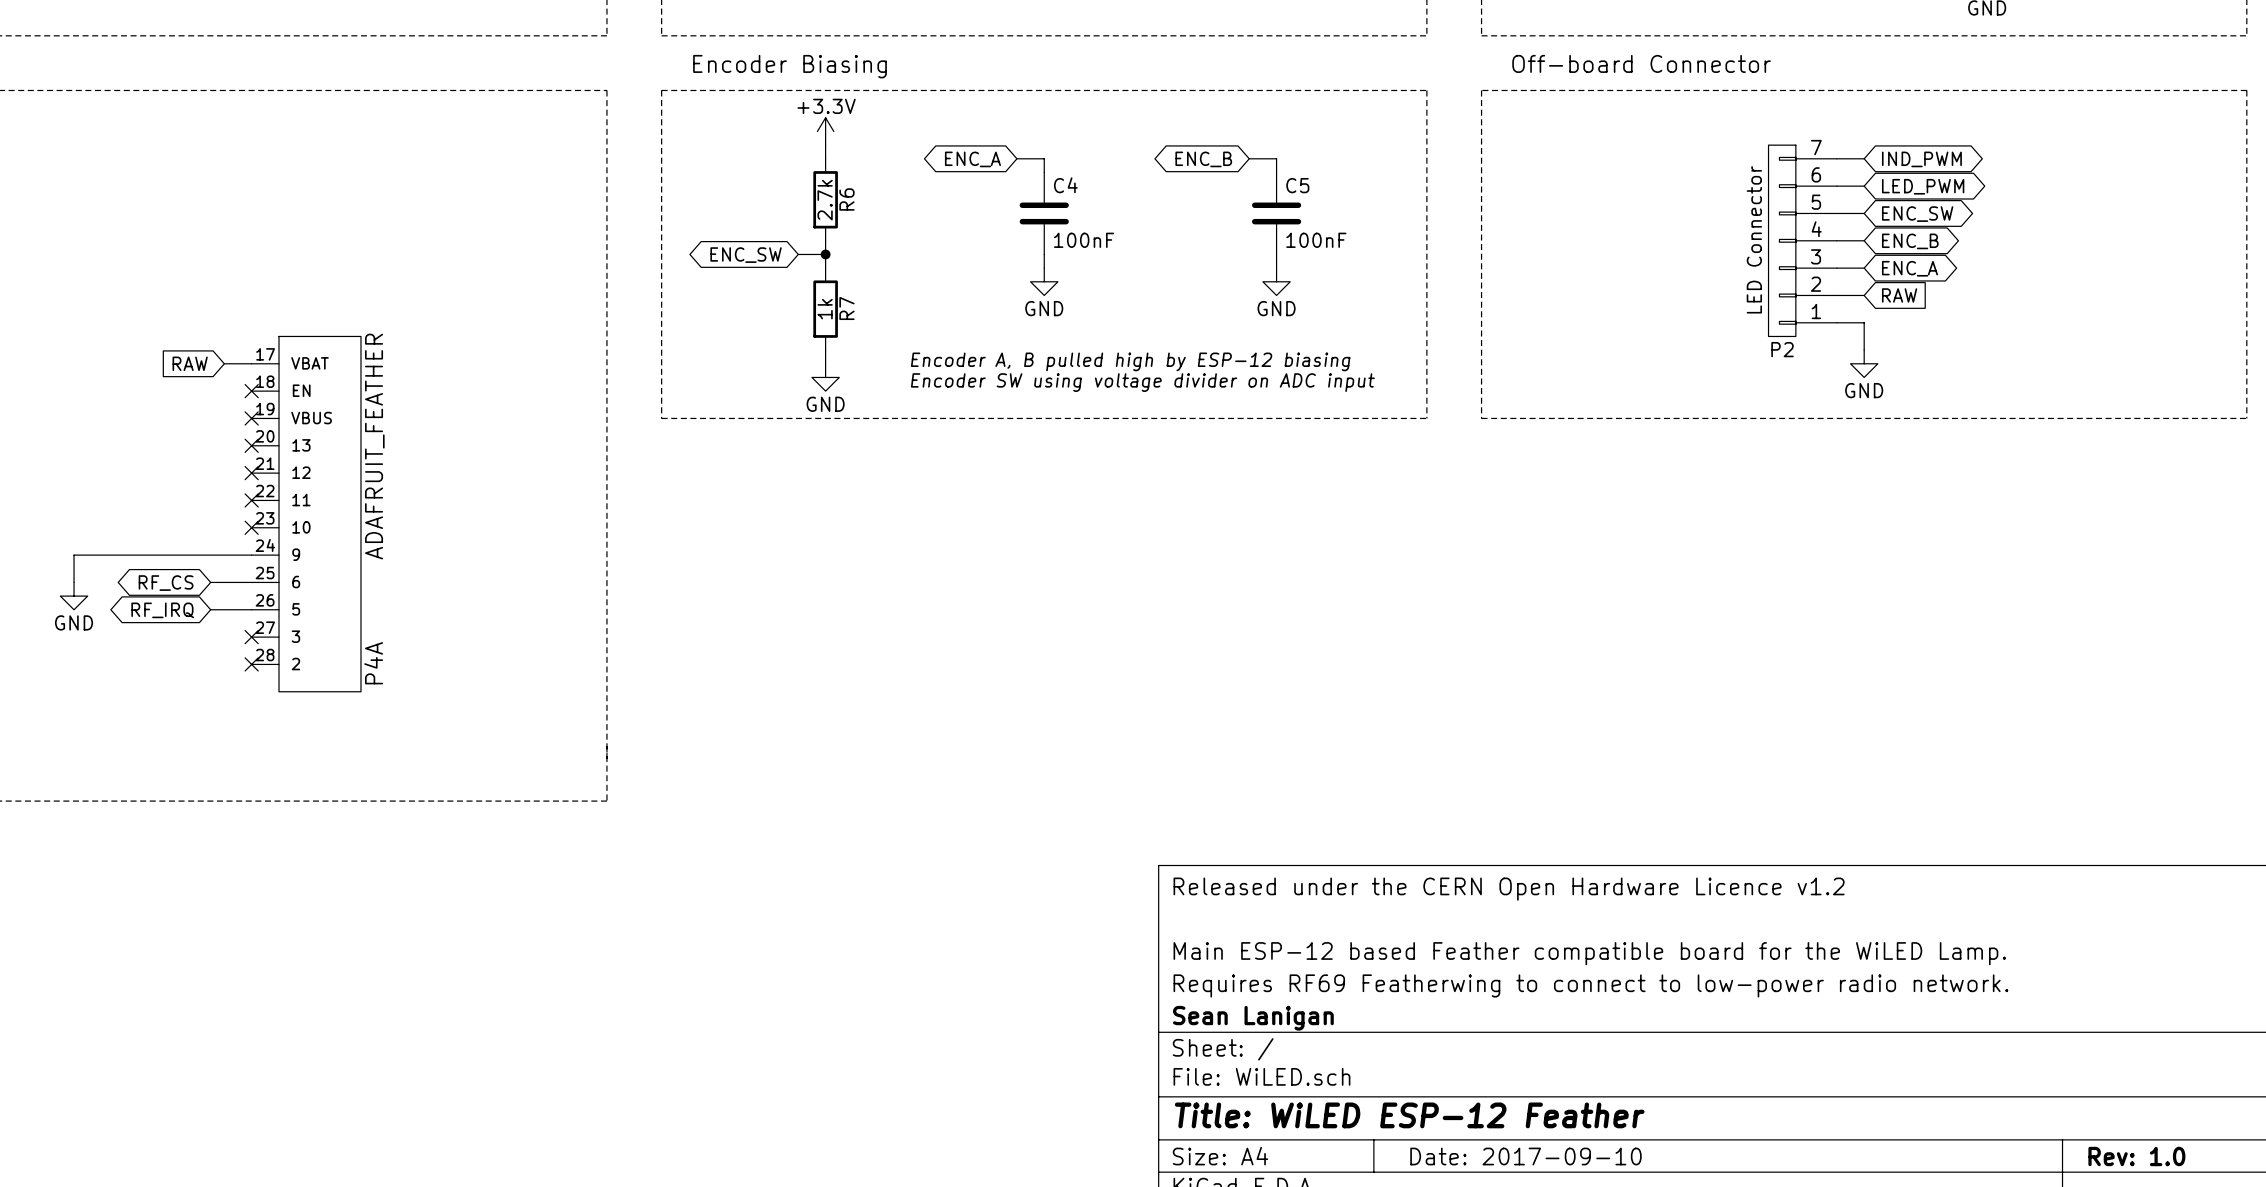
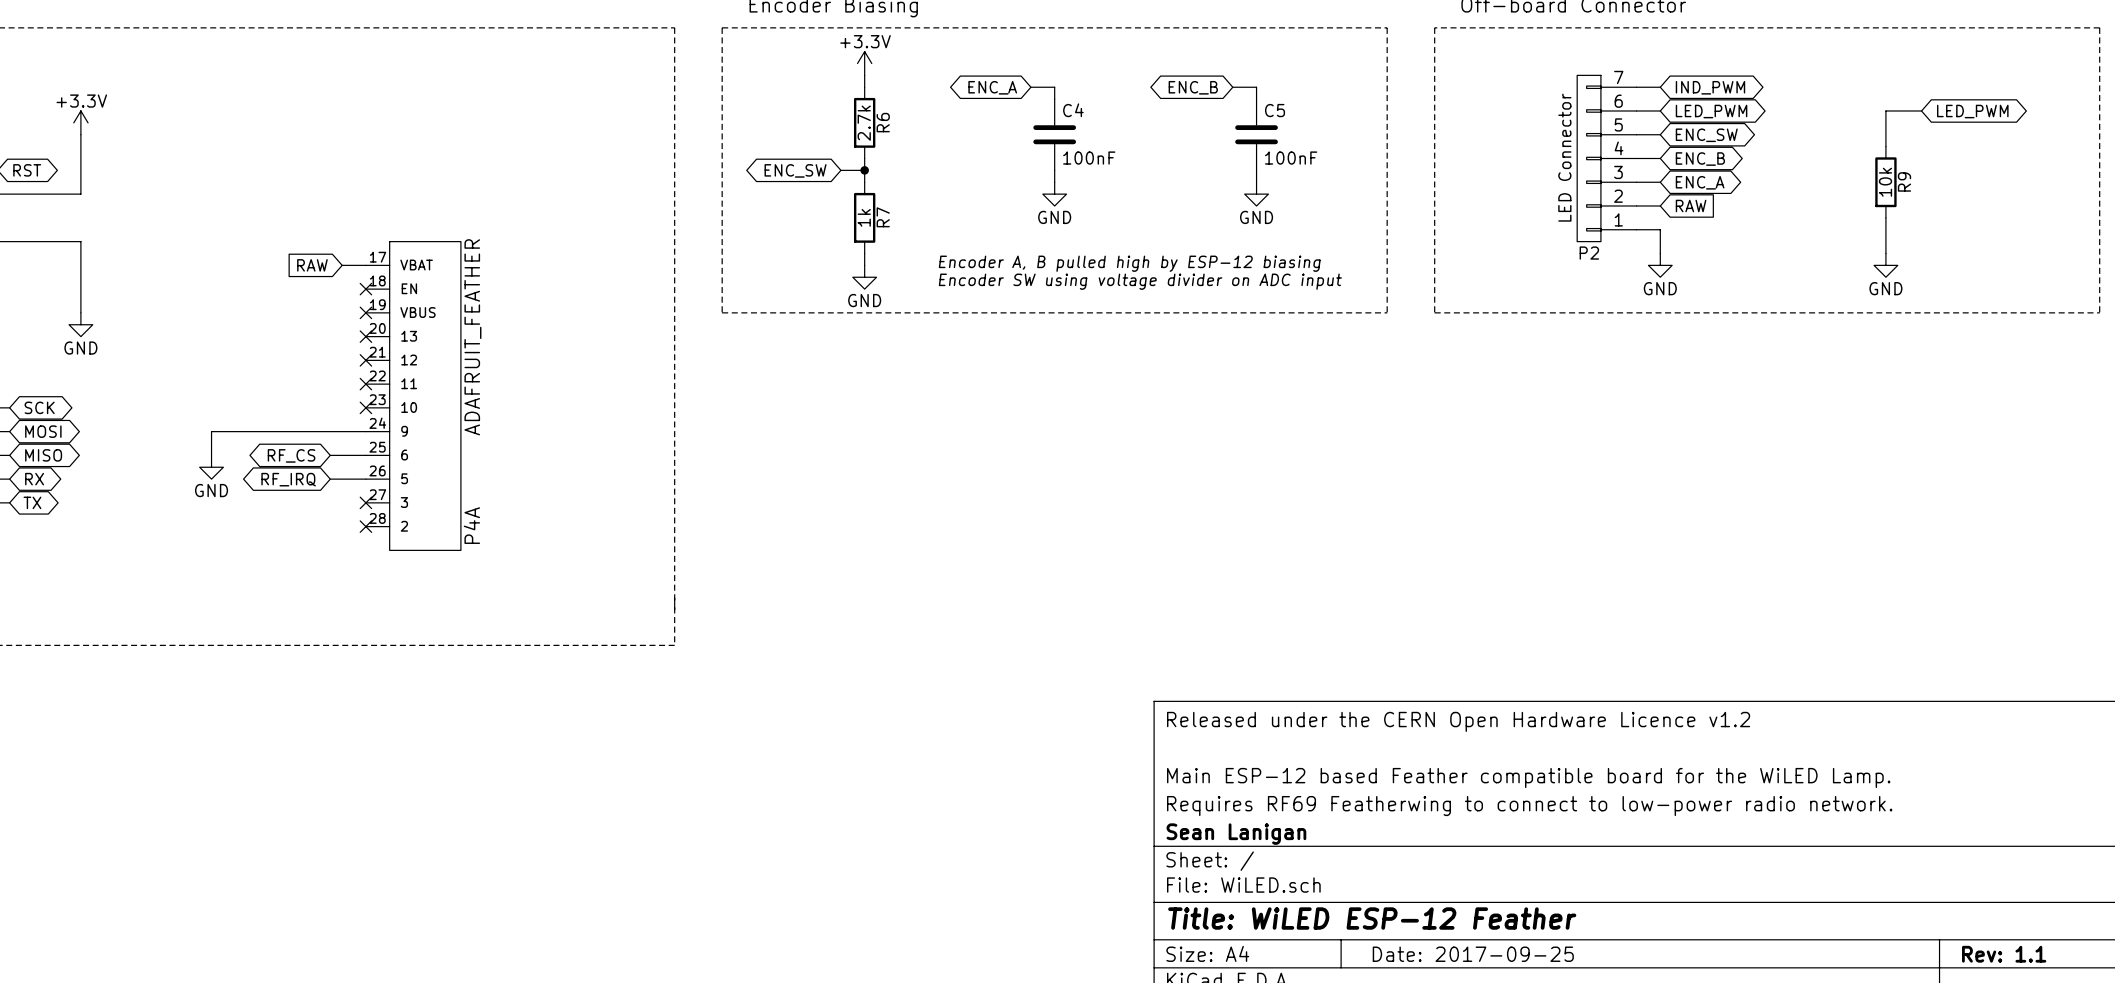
wire: (1836, 158) (1864, 158) -> (1636, 87) (1660, 87)
global label position: IND_PWM (1921, 159) -> IND_PWM (1710, 87)
wire: (1836, 186) (1864, 186) -> (1636, 110) (1660, 110)
global label position: LED_PWM (1923, 186) -> LED_PWM (1711, 111)
wire: none -> (1921, 110) (1885, 110) (1885, 146)
global label: none -> LED_PWM (1972, 111)
wire: (1836, 213) (1864, 213) -> (1636, 134) (1660, 134)
global label position: ENC_SW (1917, 214) -> ENC_SW (1706, 135)
P2 position: (1802, 240) -> (1606, 158)
wire: (1836, 240) (1864, 240) -> (1636, 158) (1660, 158)
global label position: ENC_B (1910, 241) -> ENC_B (1700, 159)
wire: (1836, 268) (1864, 268) -> (1636, 182) (1660, 182)
global label position: ENC_A (1909, 268) -> ENC_A (1700, 182)
R9: none -> 10k (1885, 182)
wire: (1836, 295) (1864, 295) -> (1636, 205) (1660, 205)
global label position: RAW (1899, 295) -> RAW (1691, 205)
wire: none -> (1885, 217) (1885, 253)
wire: (1836, 322) (1864, 322) (1864, 350) -> (1636, 229) (1660, 229) (1660, 253)
power symbol: none -> GND (1660, 265)
power symbol: GND (1864, 363) -> none
power symbol: none -> GND (1885, 265)
title block: Date: 2017-09-10 (1525, 1156) -> Date: 2017-09-25 (1473, 954)
title block: Rev: 1.0 (2136, 1156) -> Rev: 1.1 (2004, 954)

